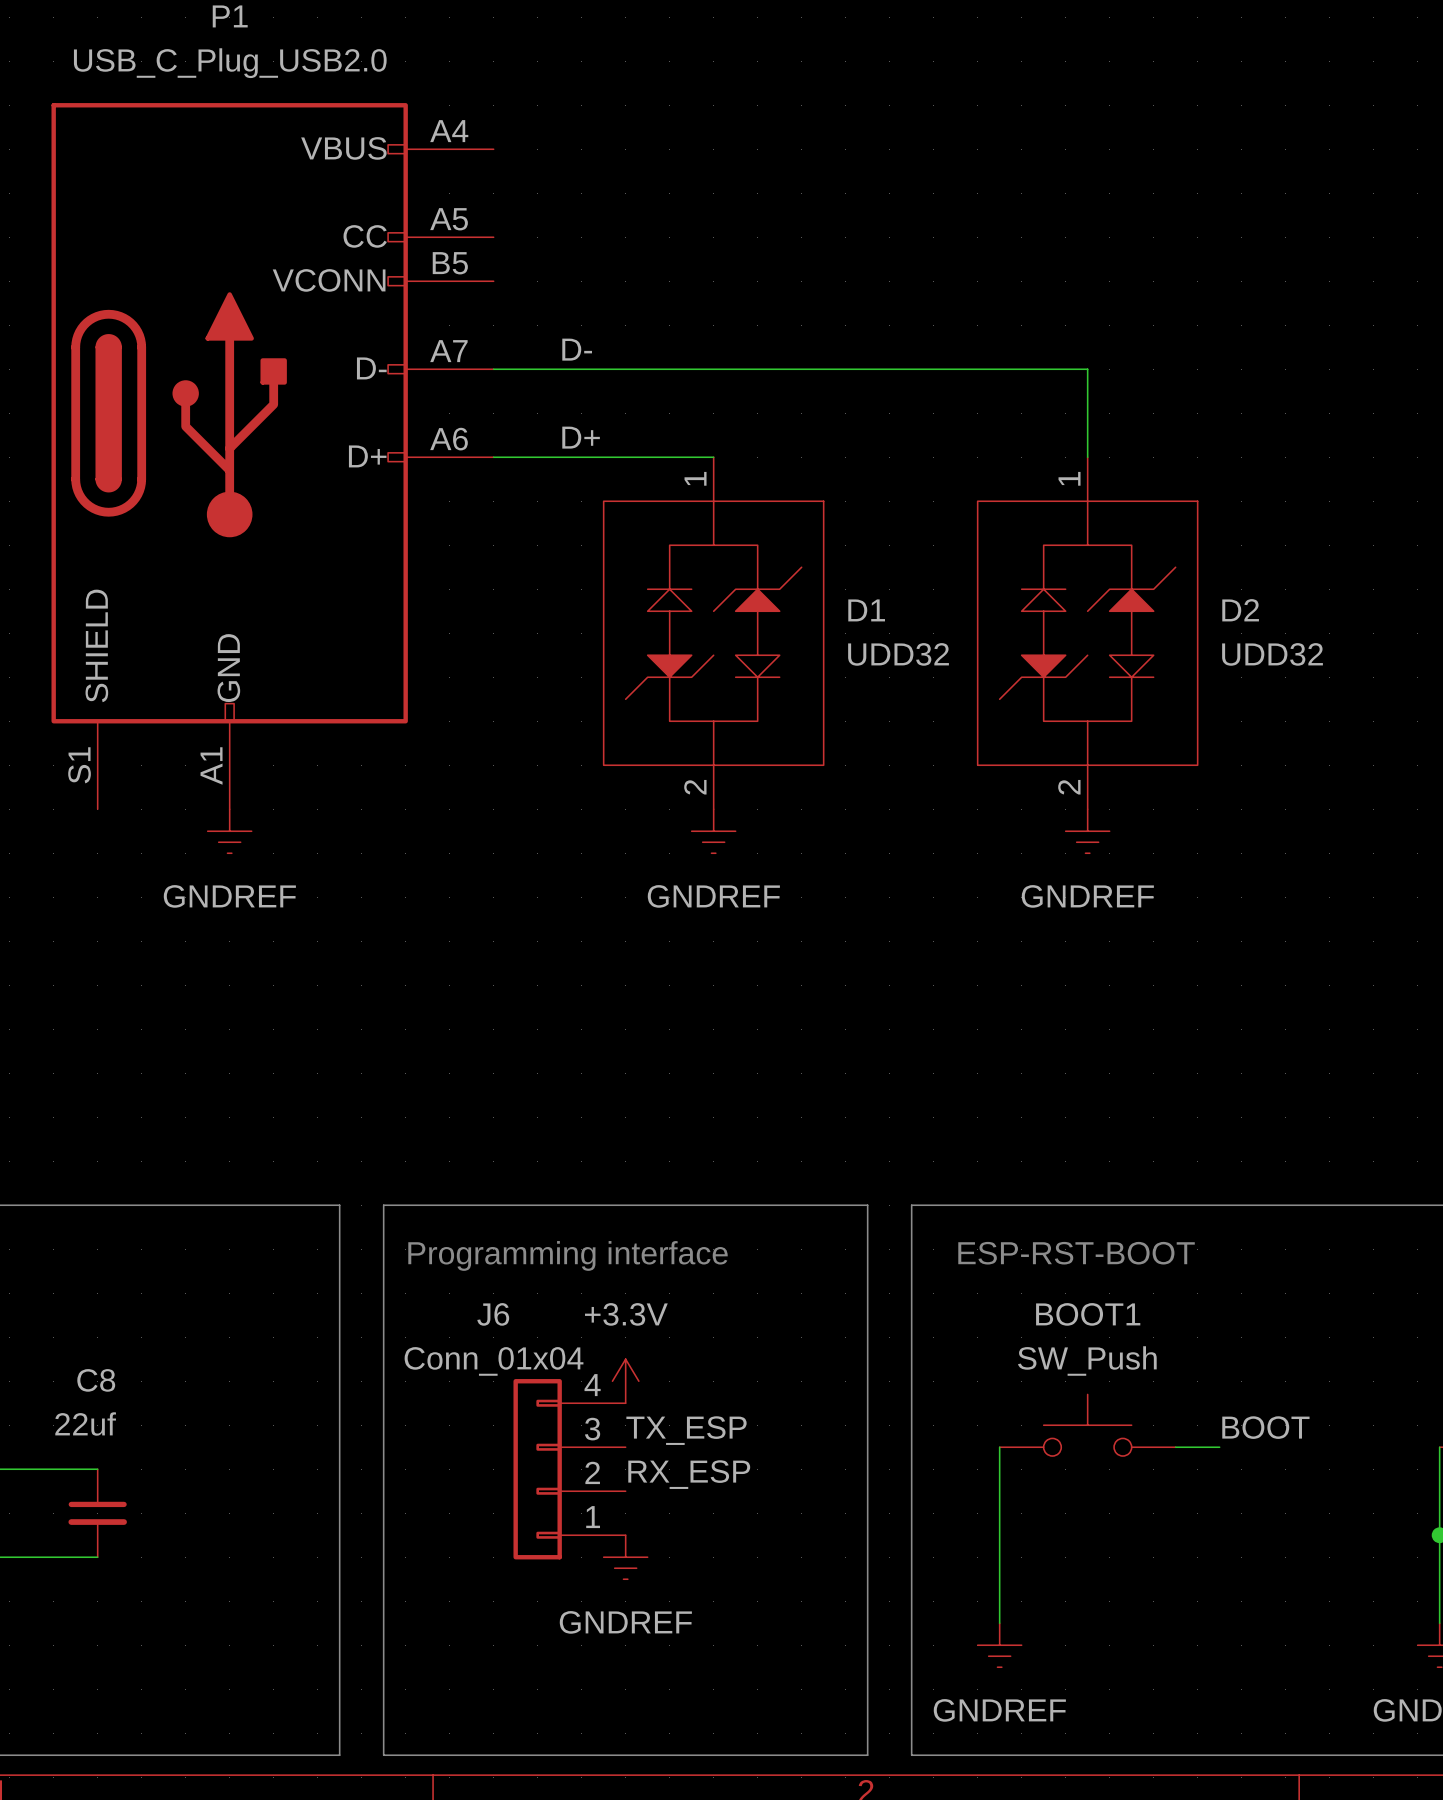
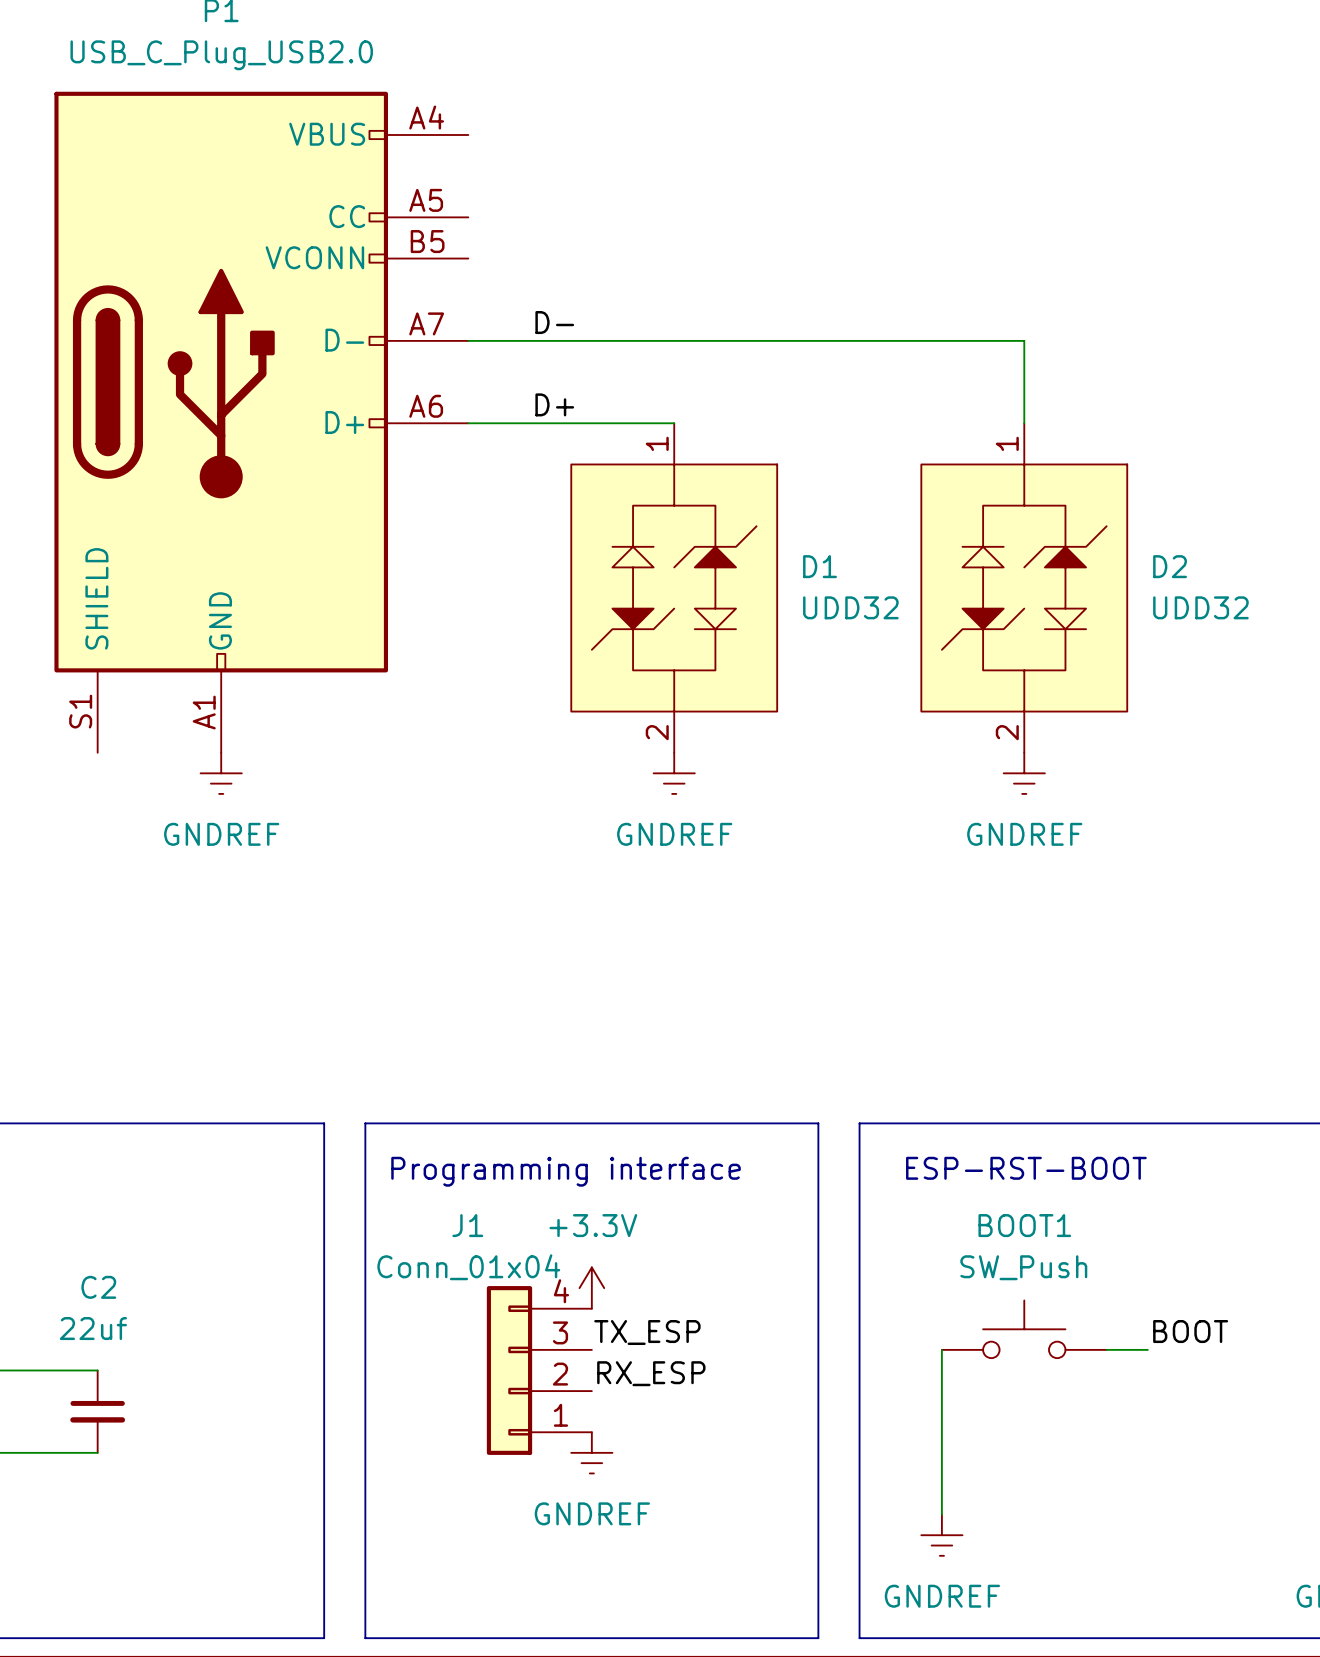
J6 name: J6 (493, 1314) -> J1 (467, 1225)
C8 name: C8 (96, 1380) -> C2 (98, 1287)

